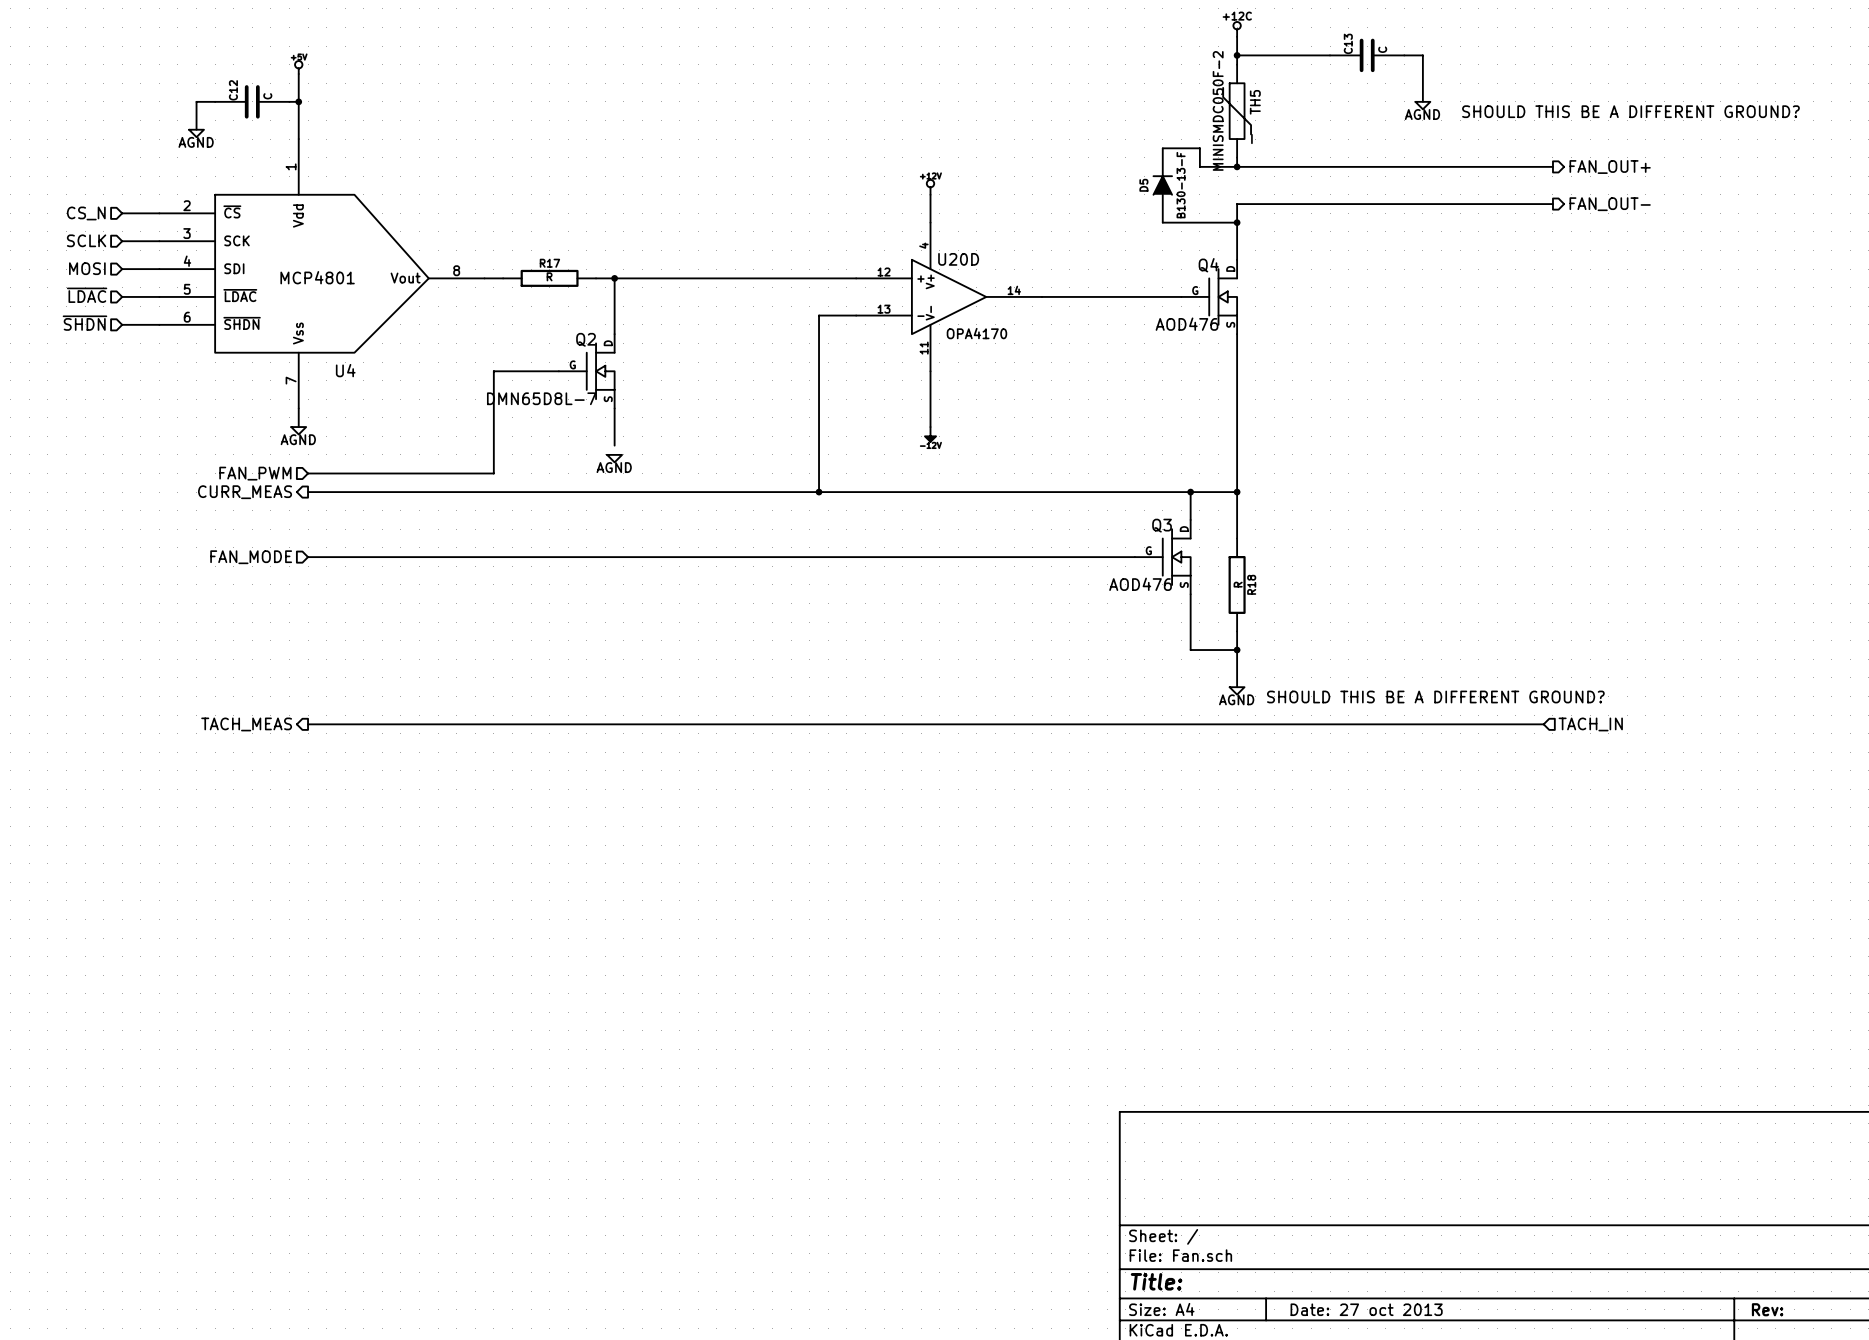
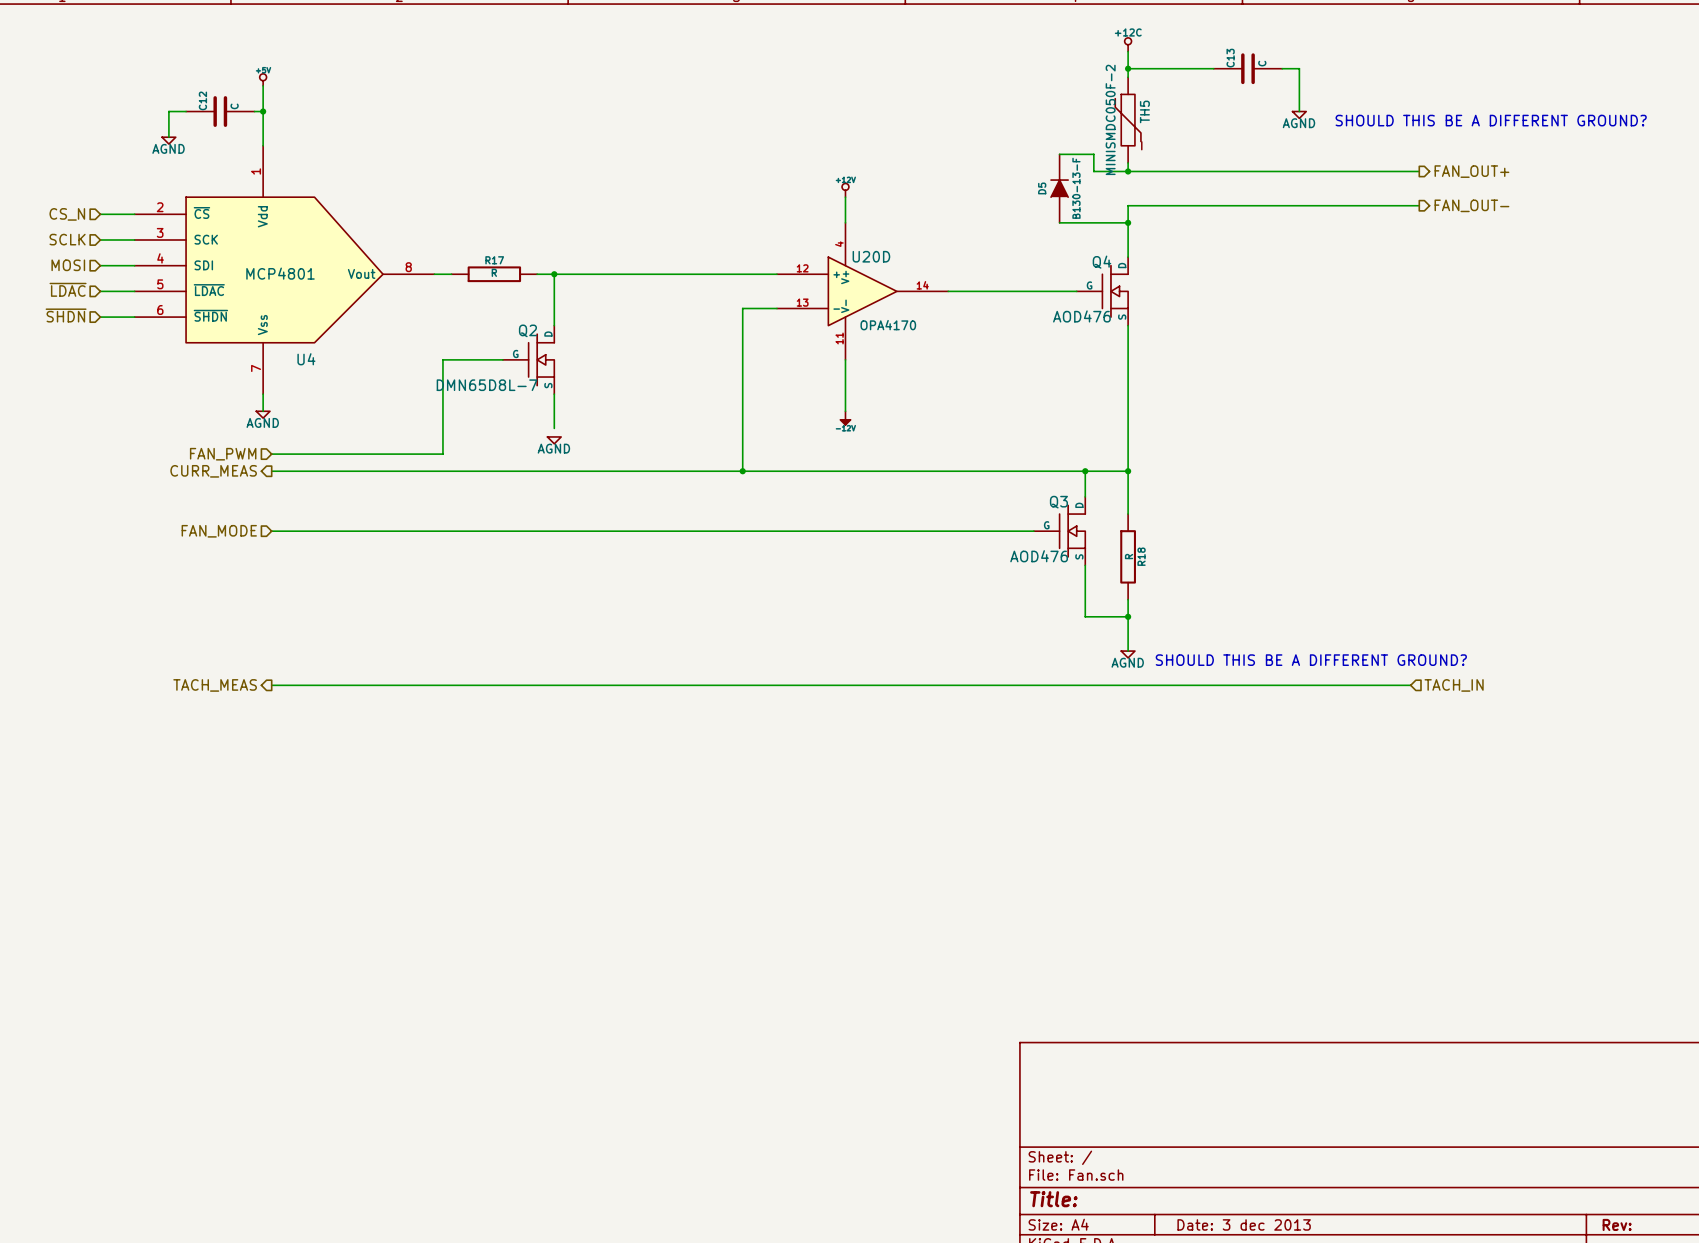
title block: Date: 27 oct 2013 (1366, 1309) -> Date: 3 dec 2013 (1244, 1224)

